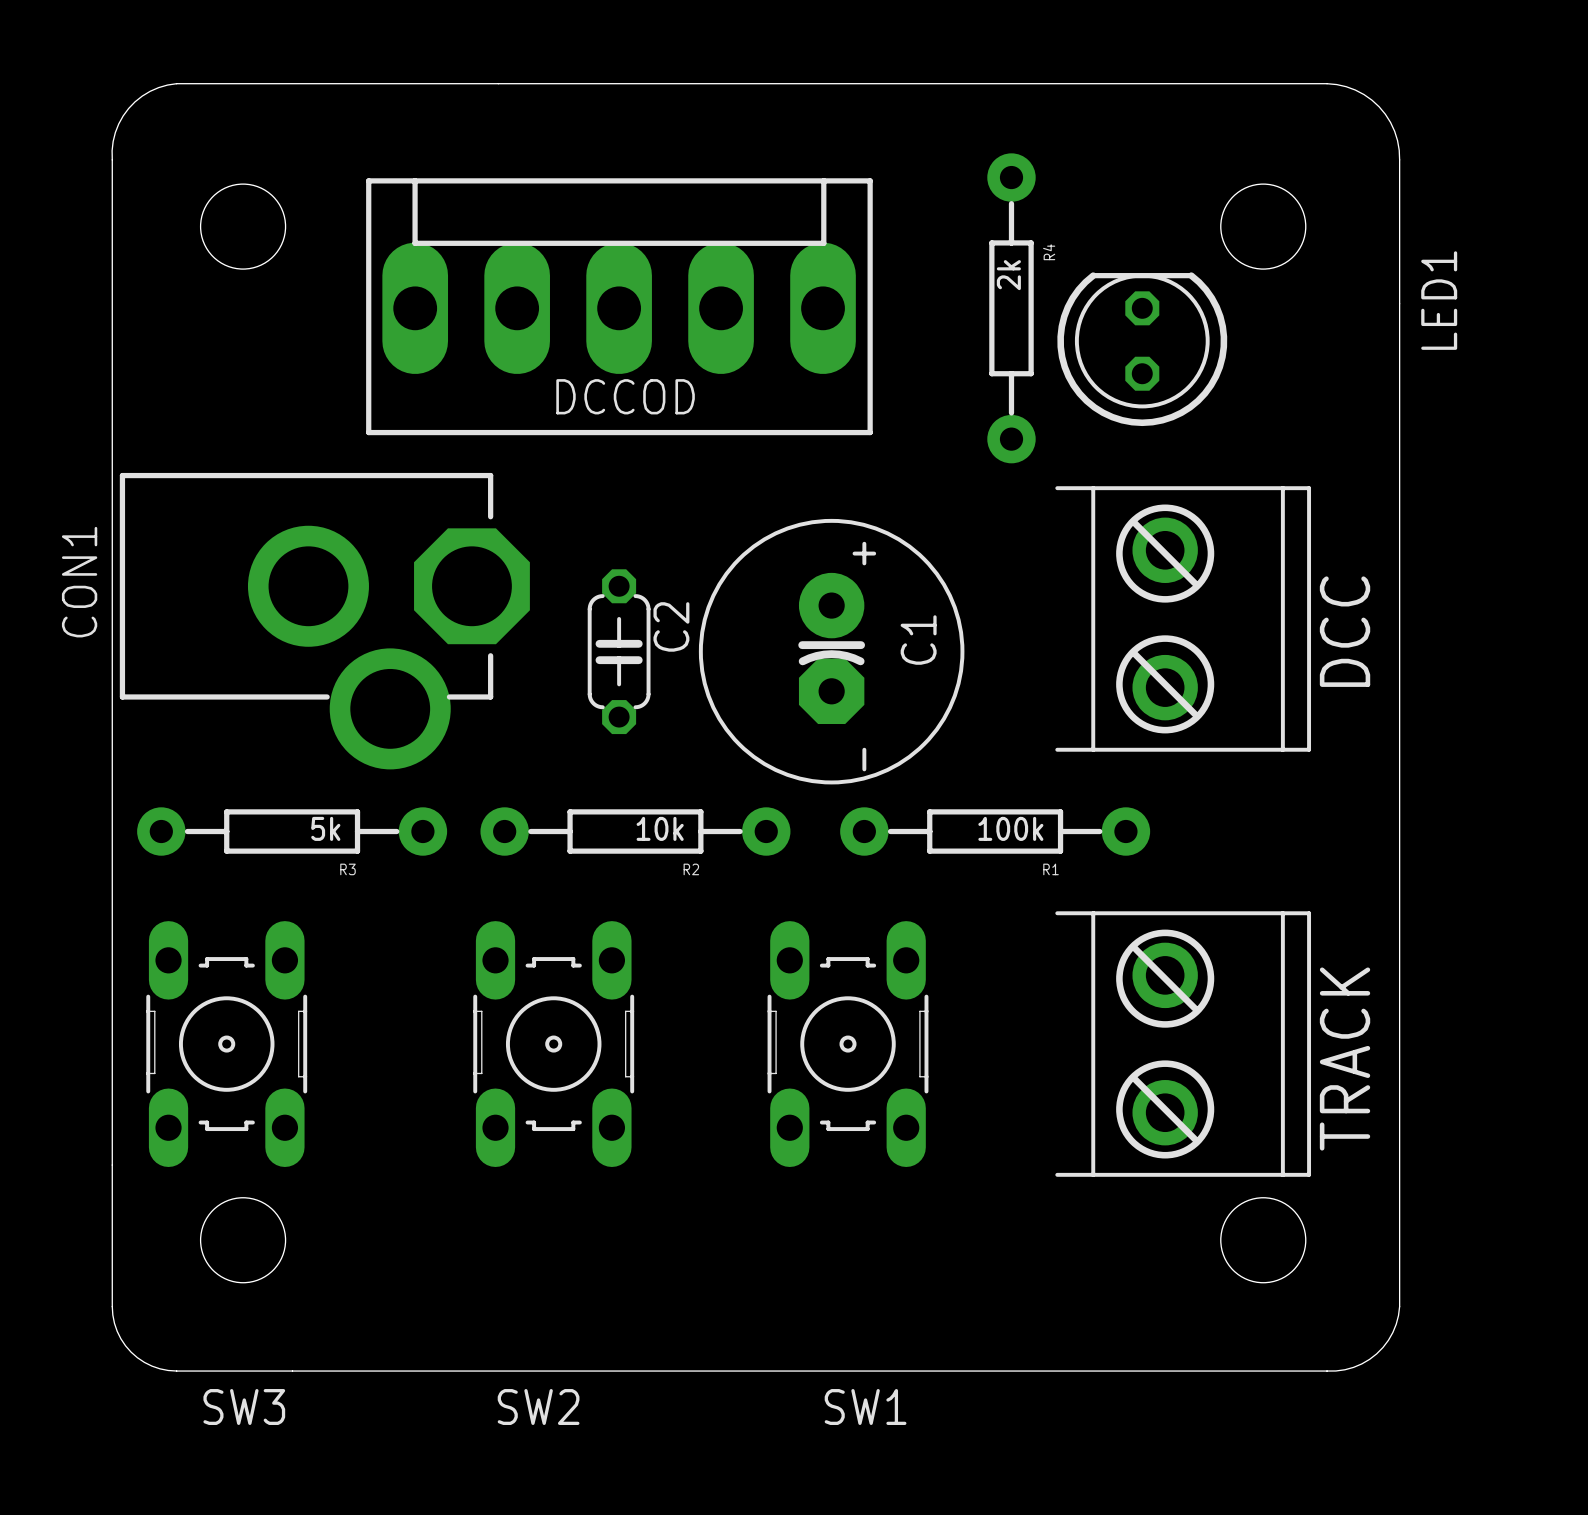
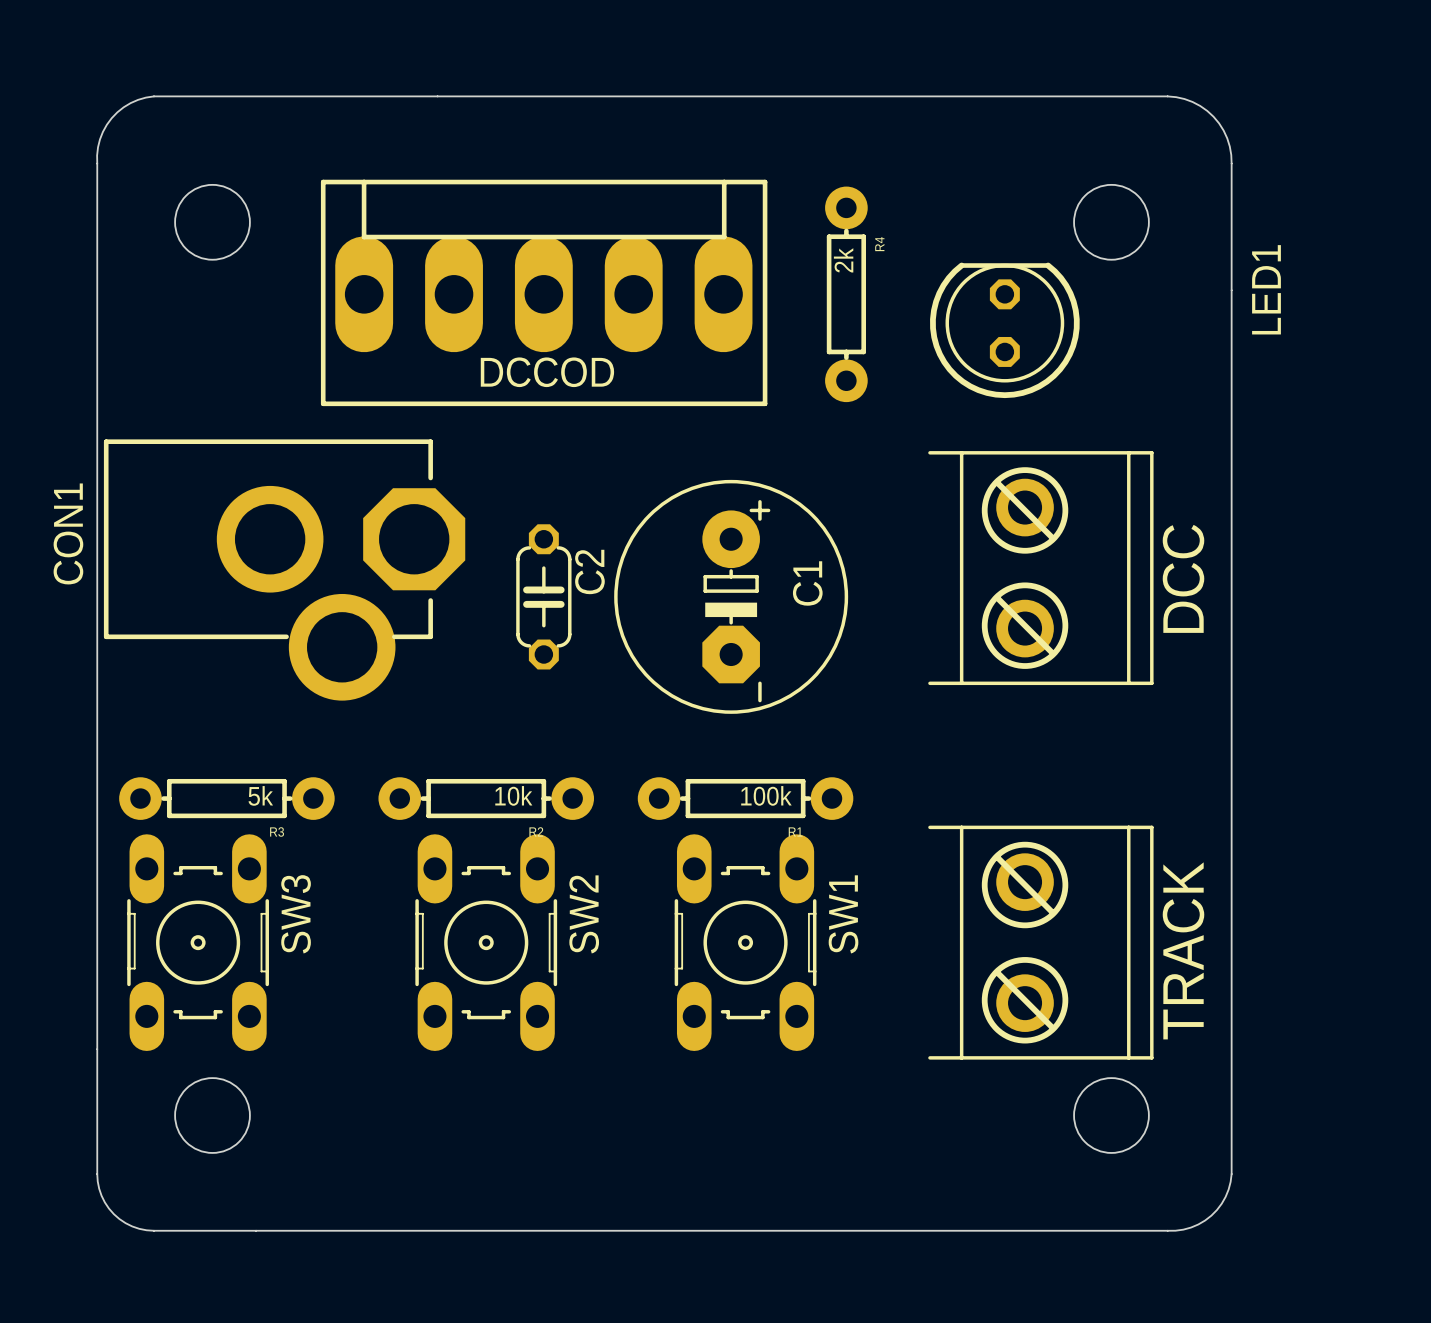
R4 footprint: [987, 153, 1036, 464] -> [825, 186, 868, 403]
C1 footprint: [698, 518, 965, 785] -> [614, 479, 849, 714]
R3 footprint: [137, 807, 448, 856] -> [119, 777, 335, 820]
R2 footprint: [480, 807, 791, 856] -> [378, 777, 594, 820]
R1 footprint: [840, 807, 1151, 856] -> [637, 777, 854, 820]
SW3 name rotation: 0° (244, 1407) -> 90° counterclockwise (296, 914)
SW3 name position: SW3 (244, 1407) -> SW3 (296, 914)
SW2 name rotation: 0° (538, 1407) -> 90° counterclockwise (584, 914)
SW2 name position: SW2 (538, 1407) -> SW2 (584, 914)
SW1 name rotation: 0° (865, 1407) -> 90° counterclockwise (843, 914)
SW1 name position: SW1 (865, 1407) -> SW1 (843, 914)

